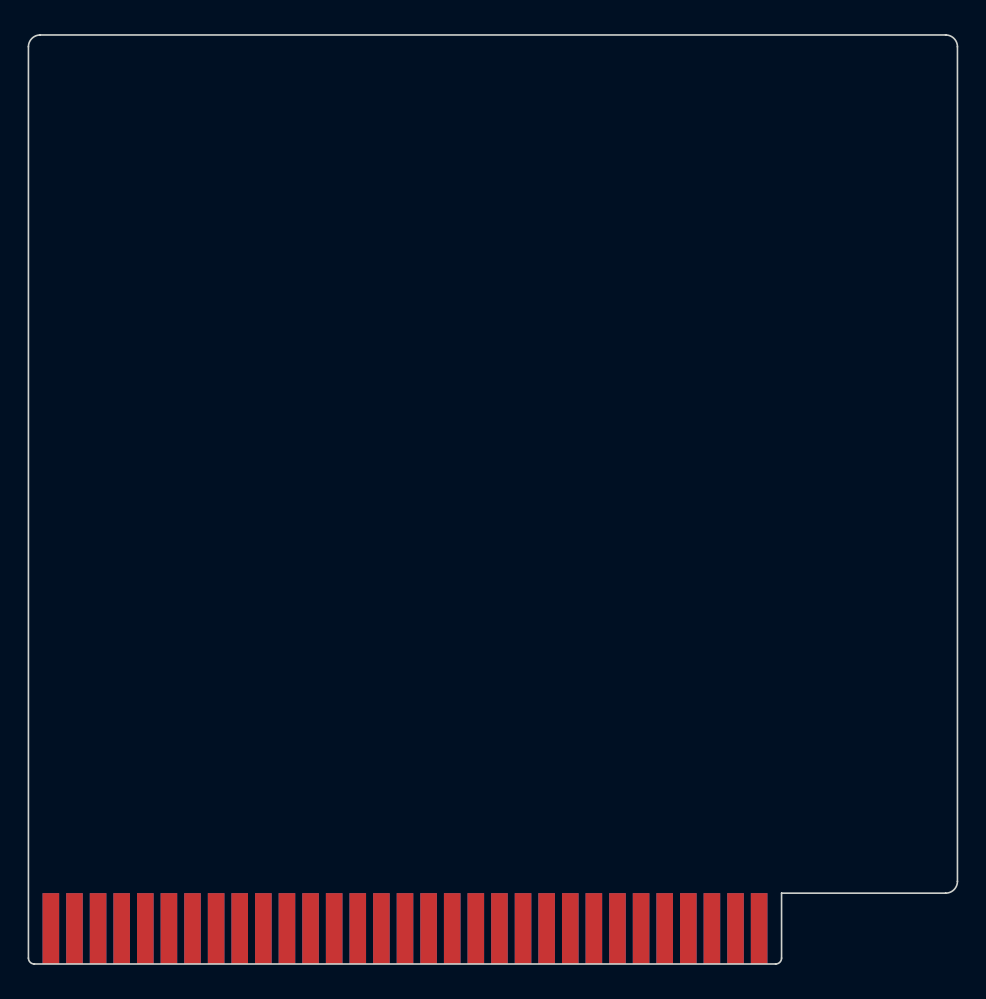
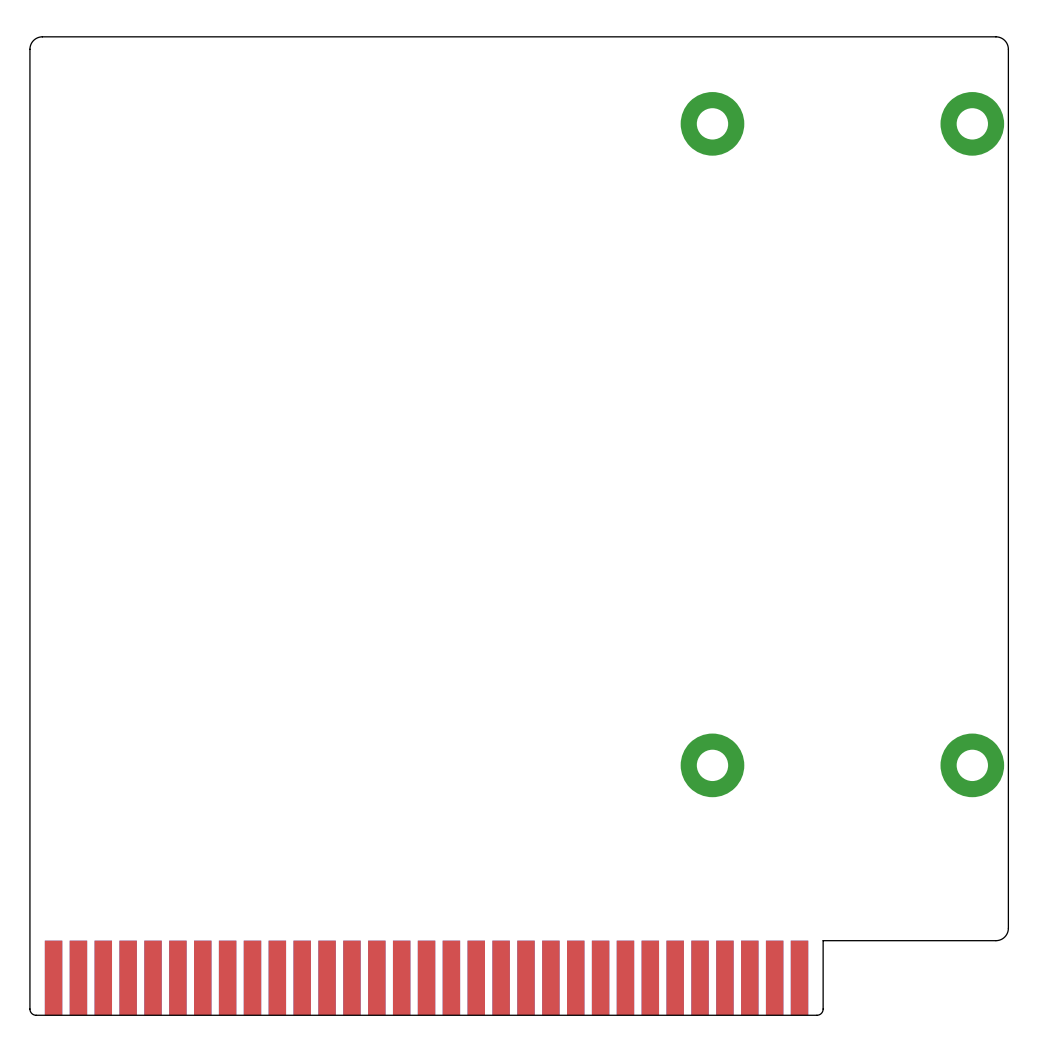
part: none -> (712, 123)
part: none -> (972, 123)
part: none -> (712, 765)
part: none -> (972, 765)

